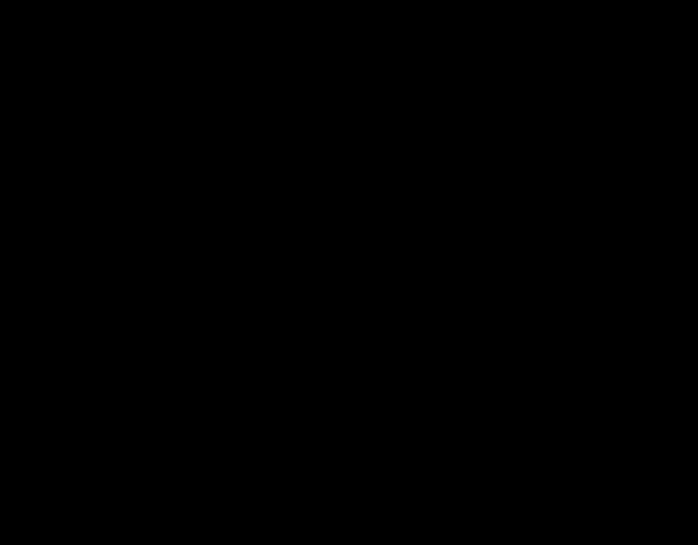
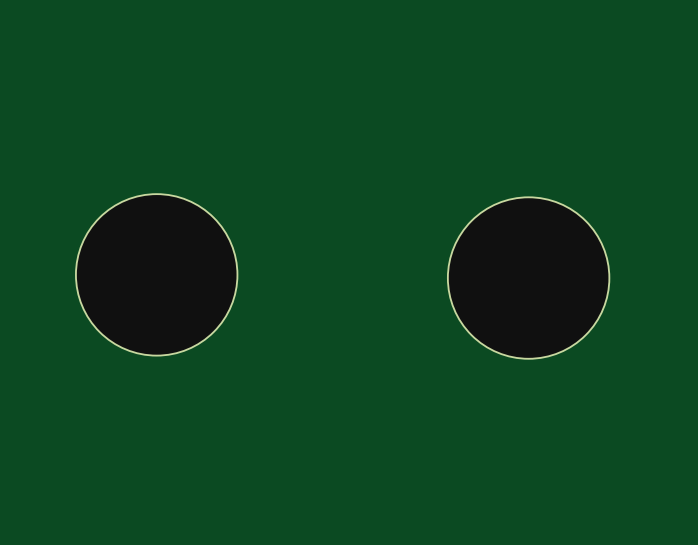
part: none -> (156, 274)
part: none -> (528, 278)

